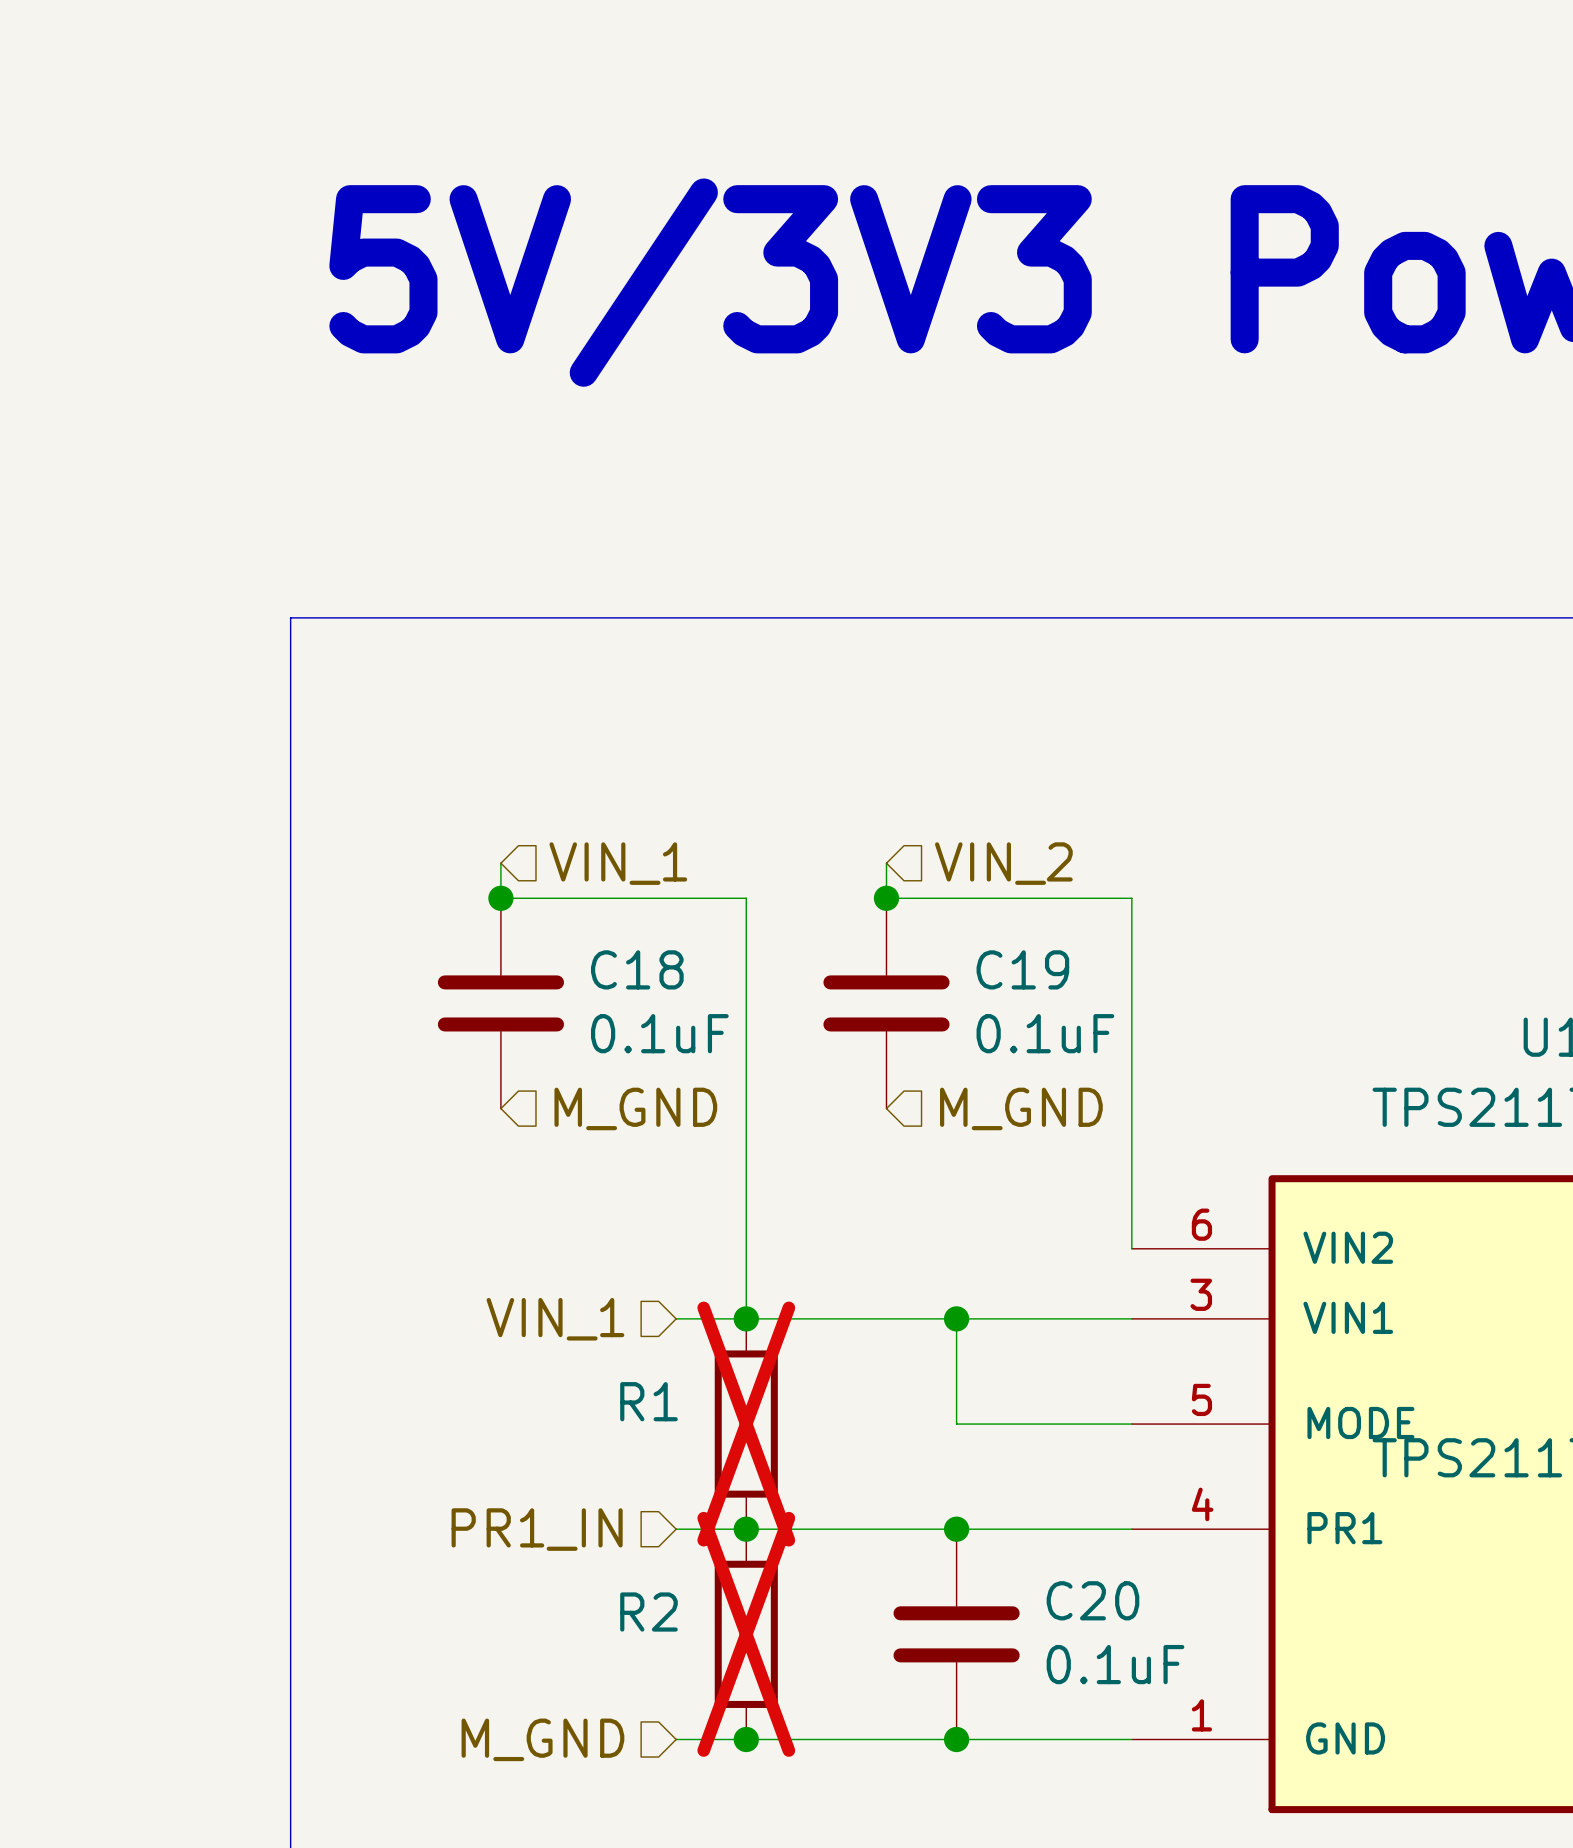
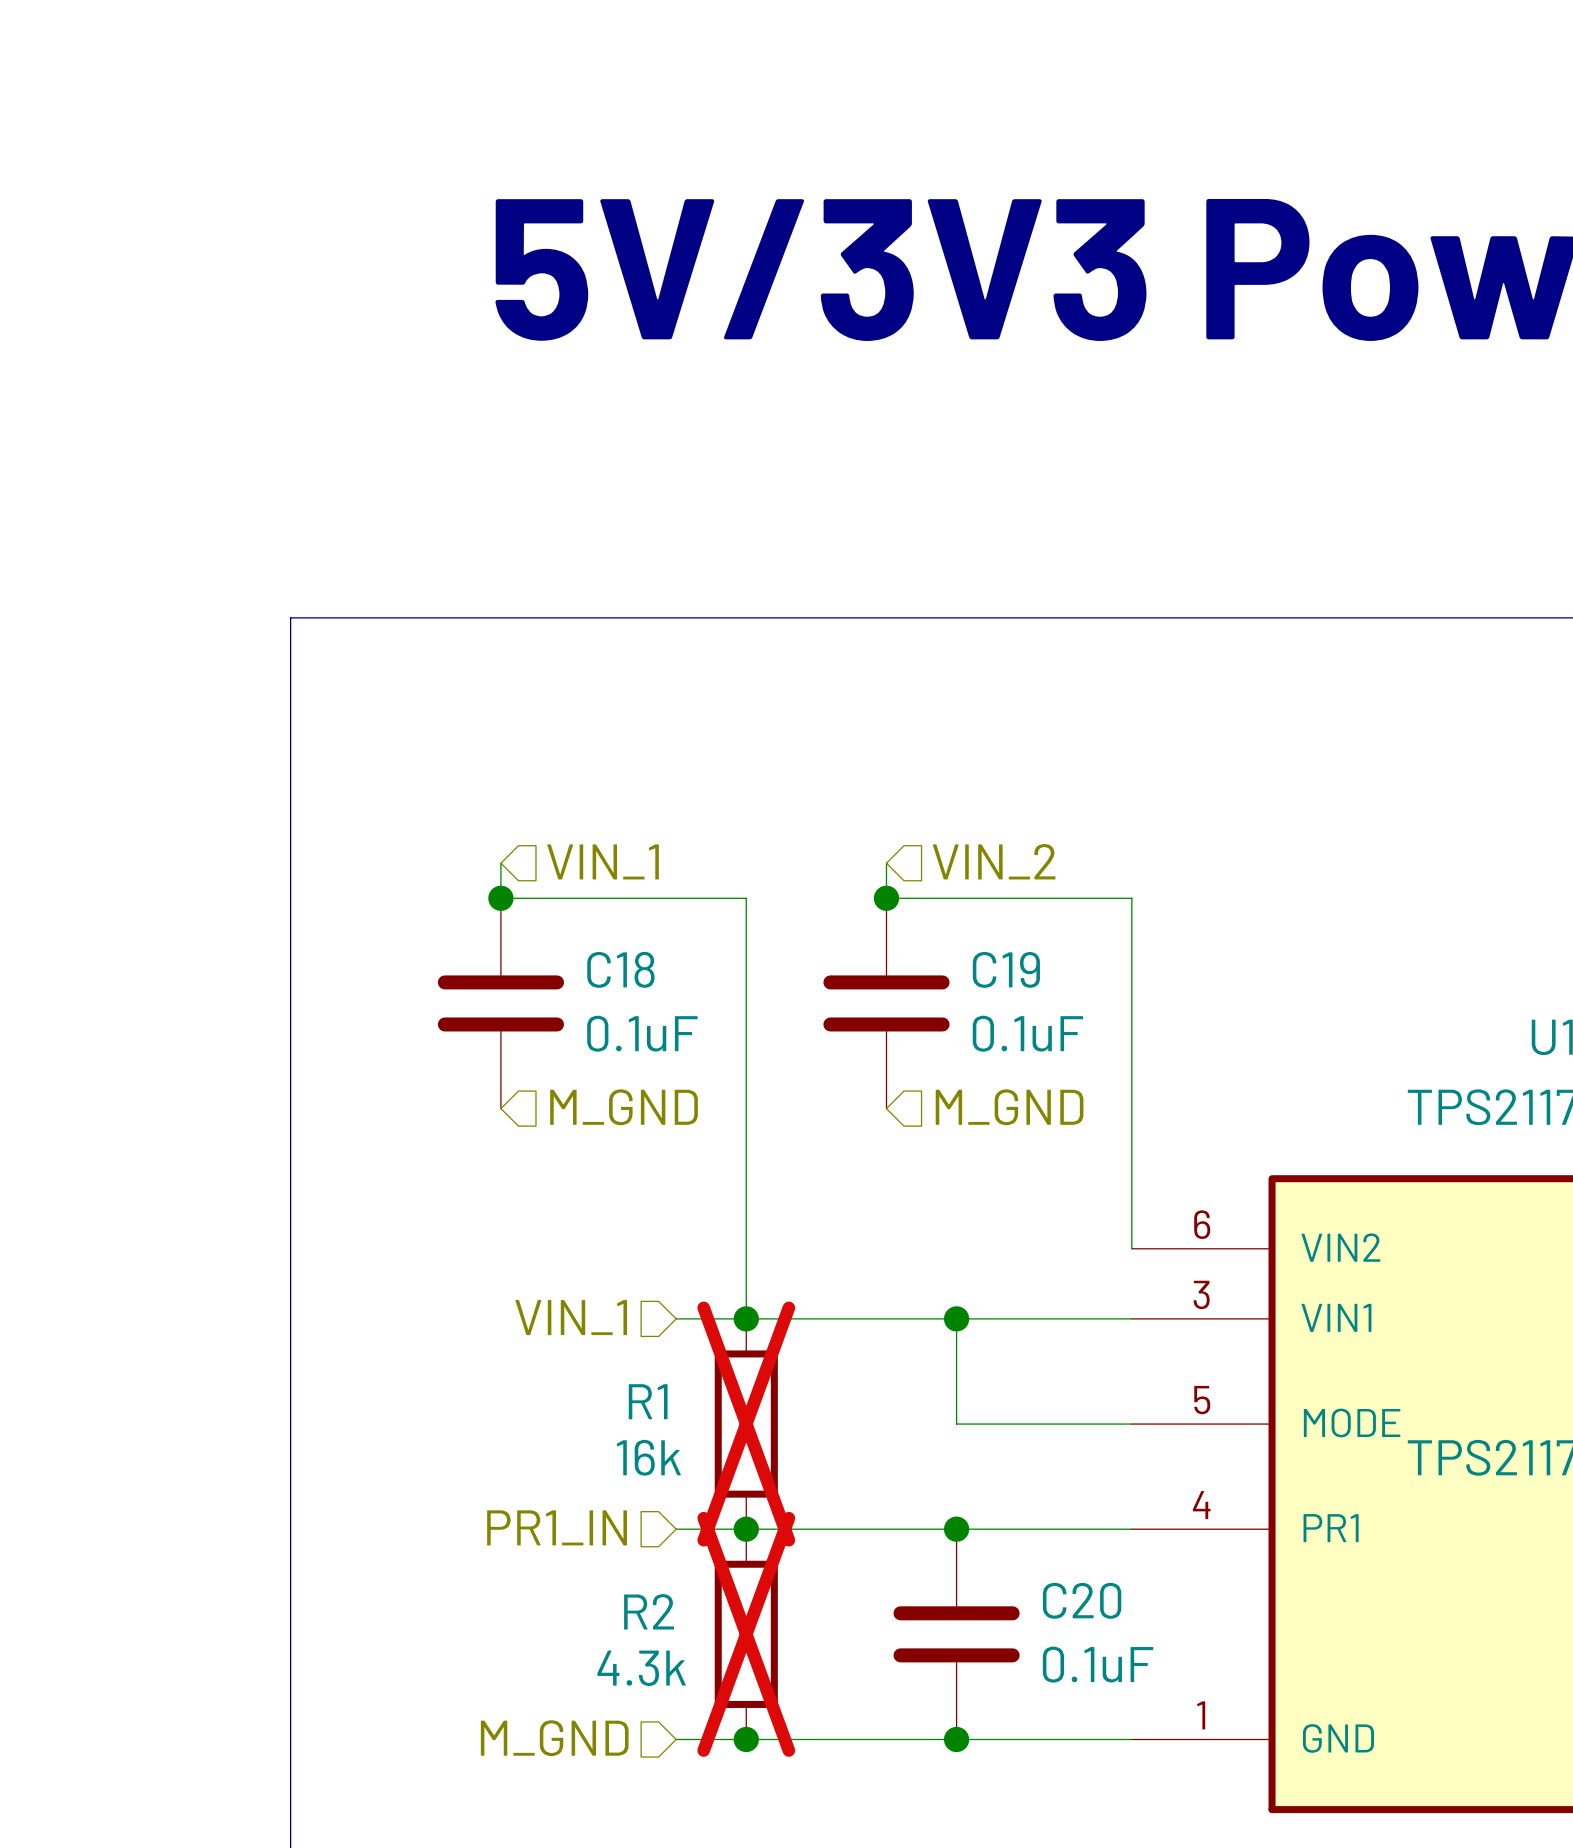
R1 value: none -> 16k (648, 1457)
R2 value: none -> 4.3k (641, 1668)

